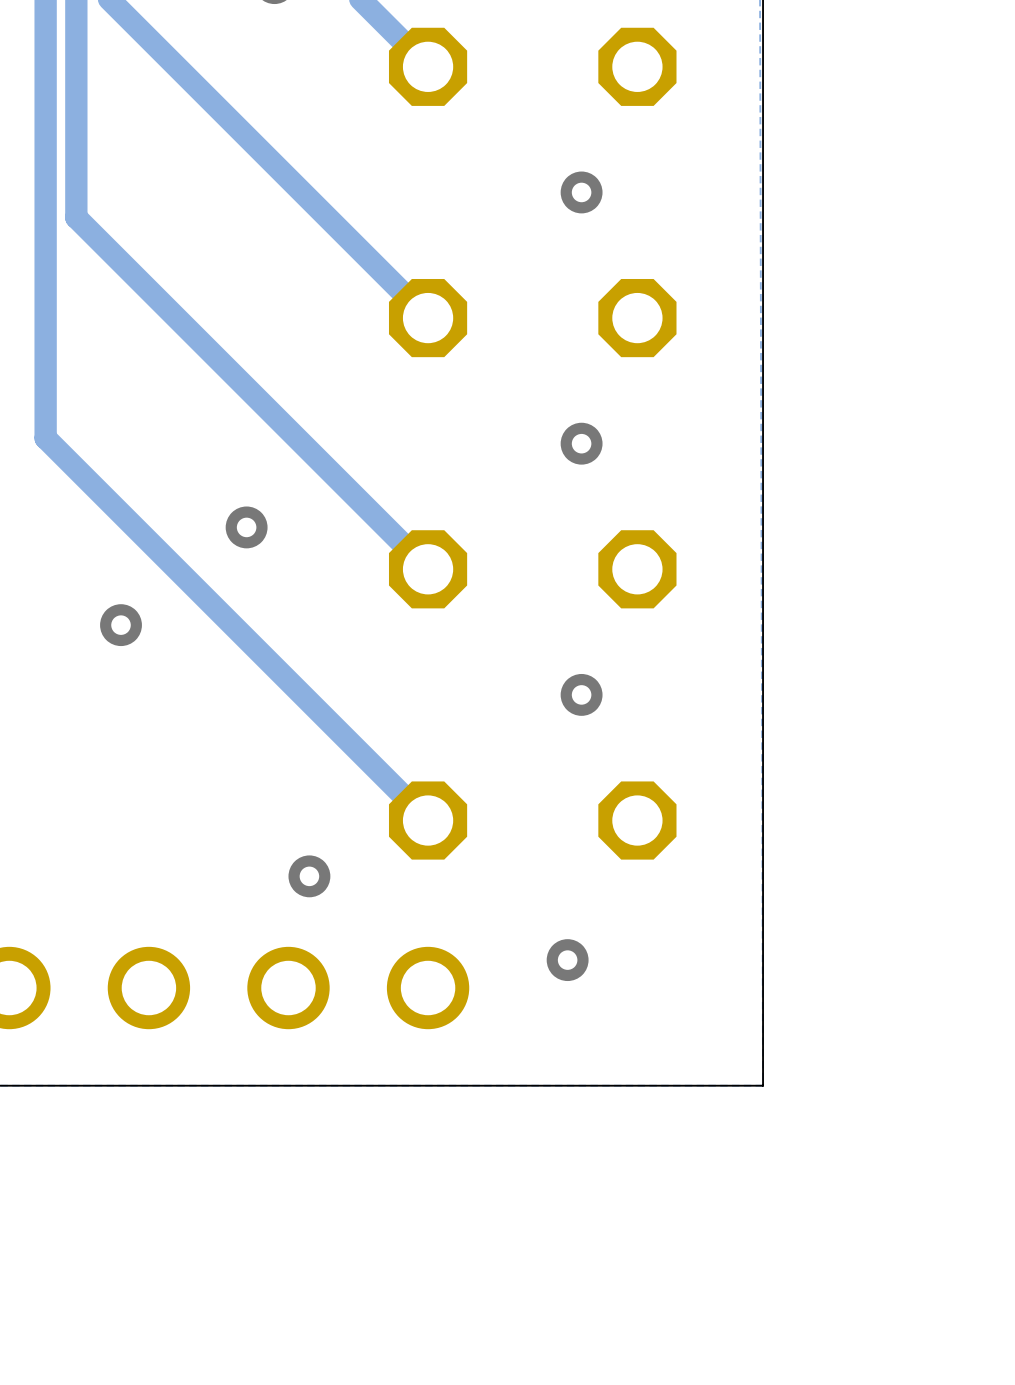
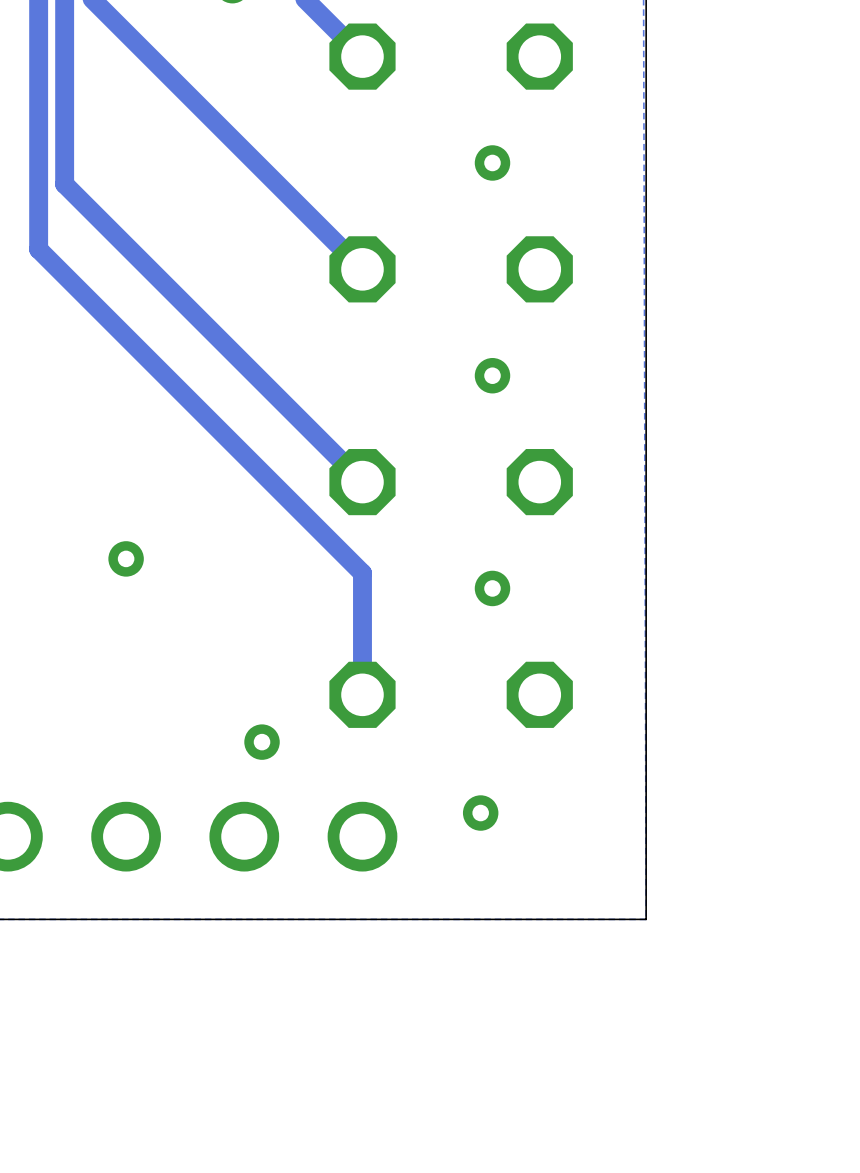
track: (45, 294) (45, 438) (428, 820) -> (38, 249) (362, 573) (362, 694)
via: (246, 527) -> none
via position: (121, 625) -> (126, 558)

